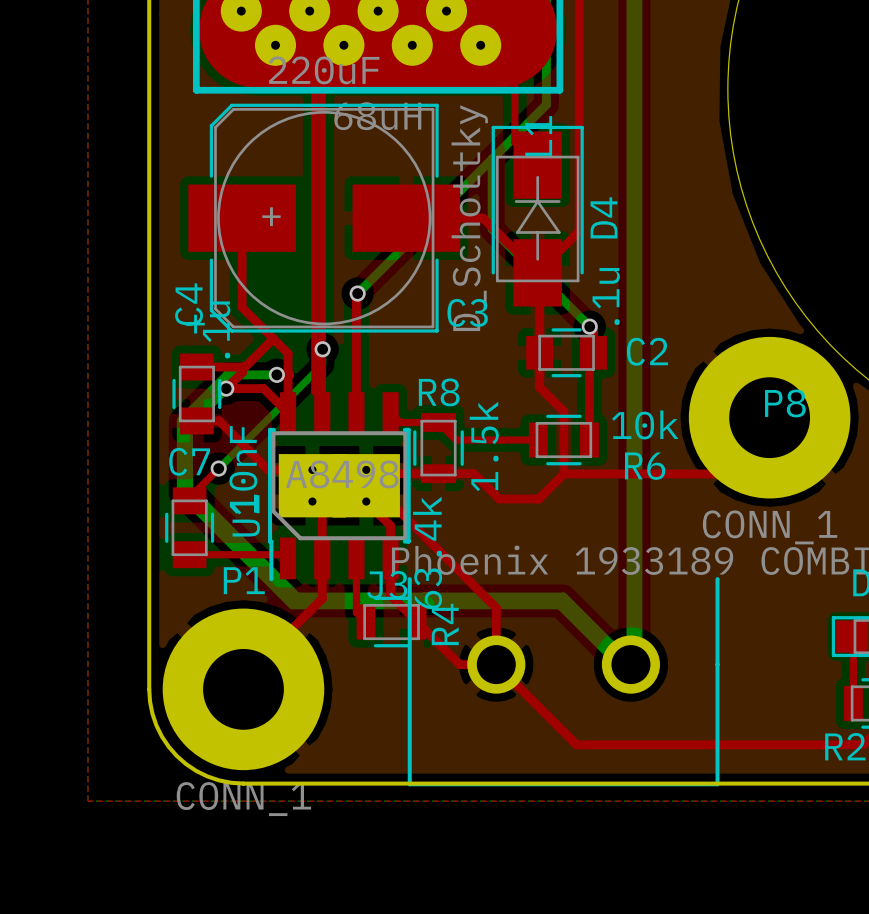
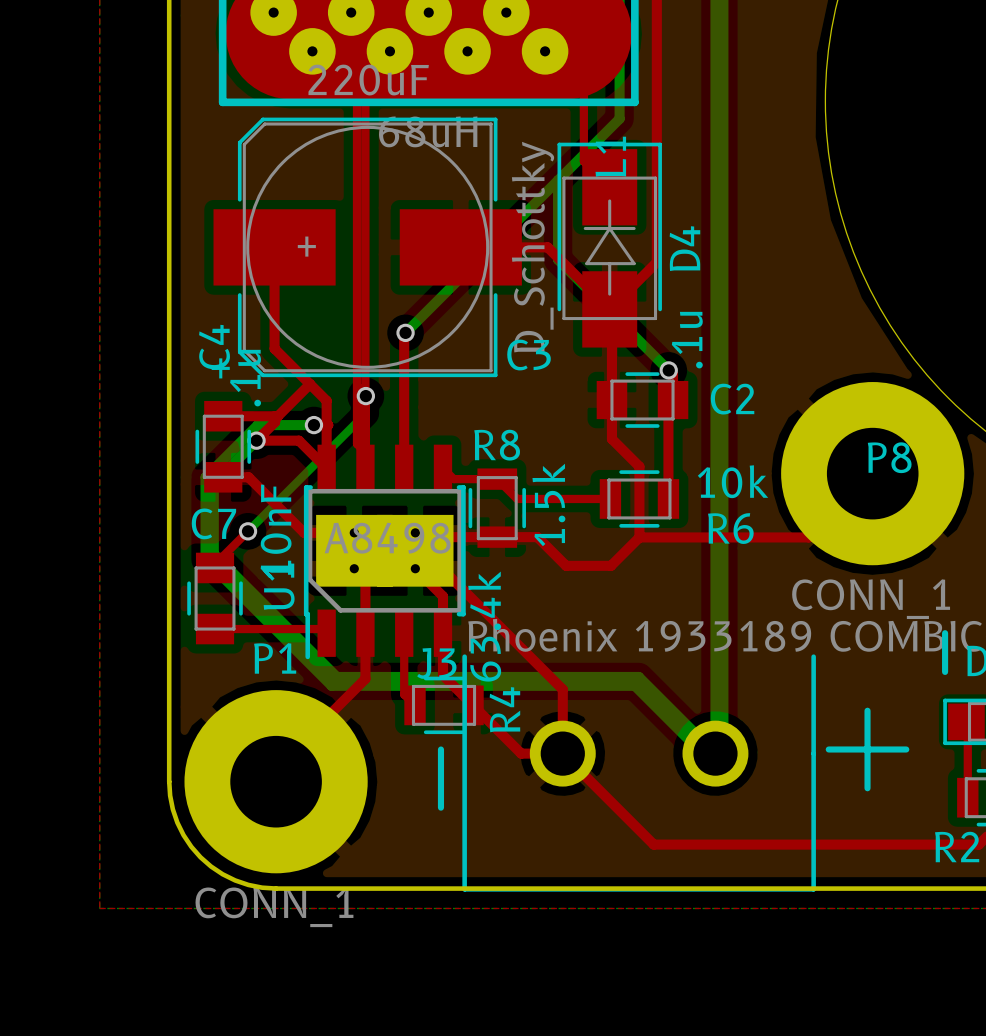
line: none -> (945, 633) (945, 671)
line: none -> (867, 710) (867, 788)
line: none -> (440, 749) (440, 807)
line: none -> (828, 749) (906, 749)

